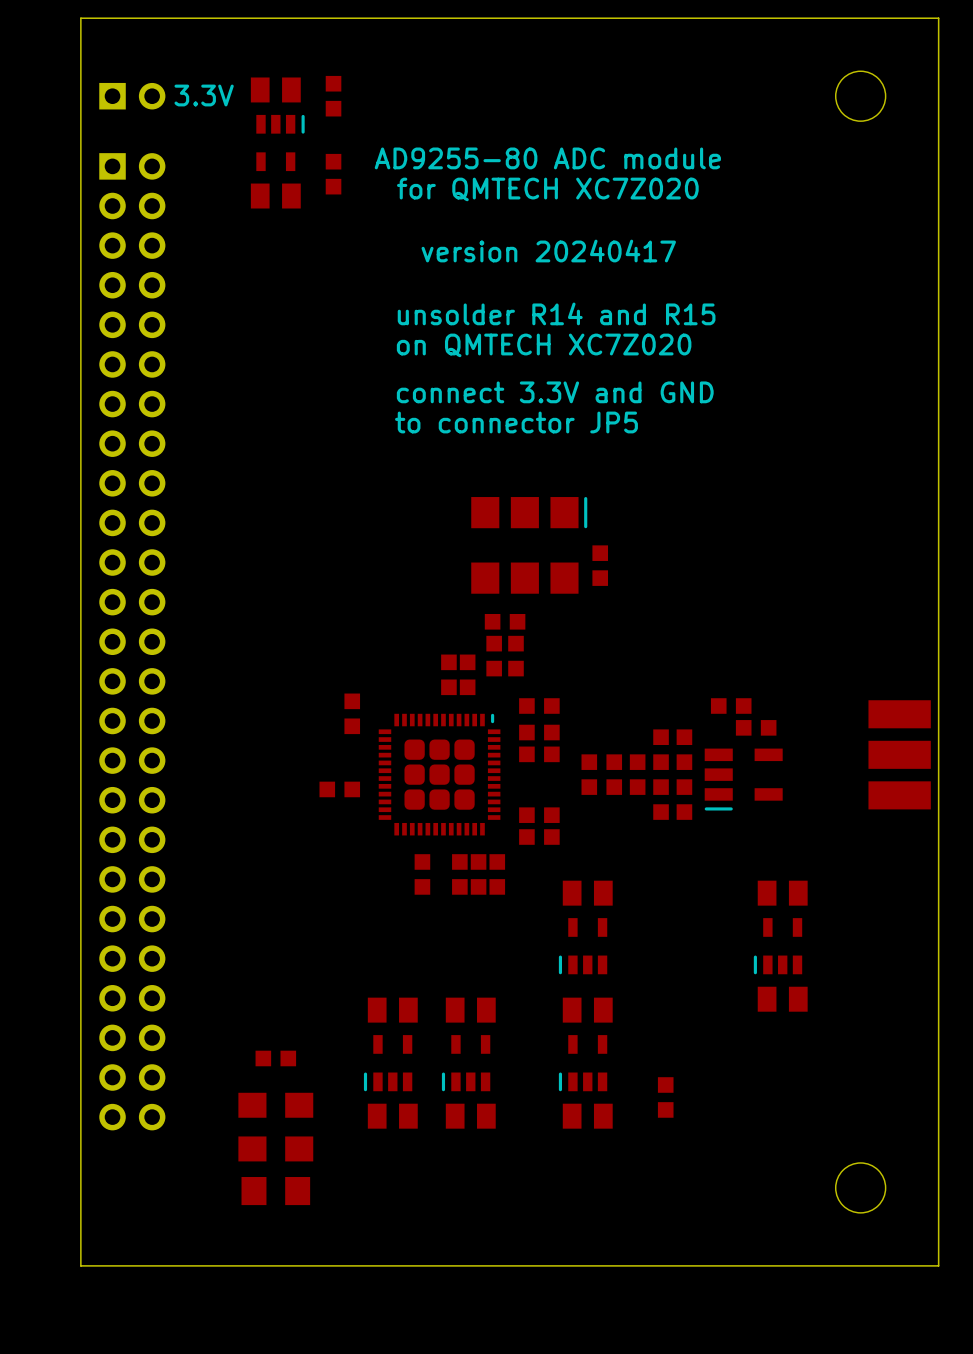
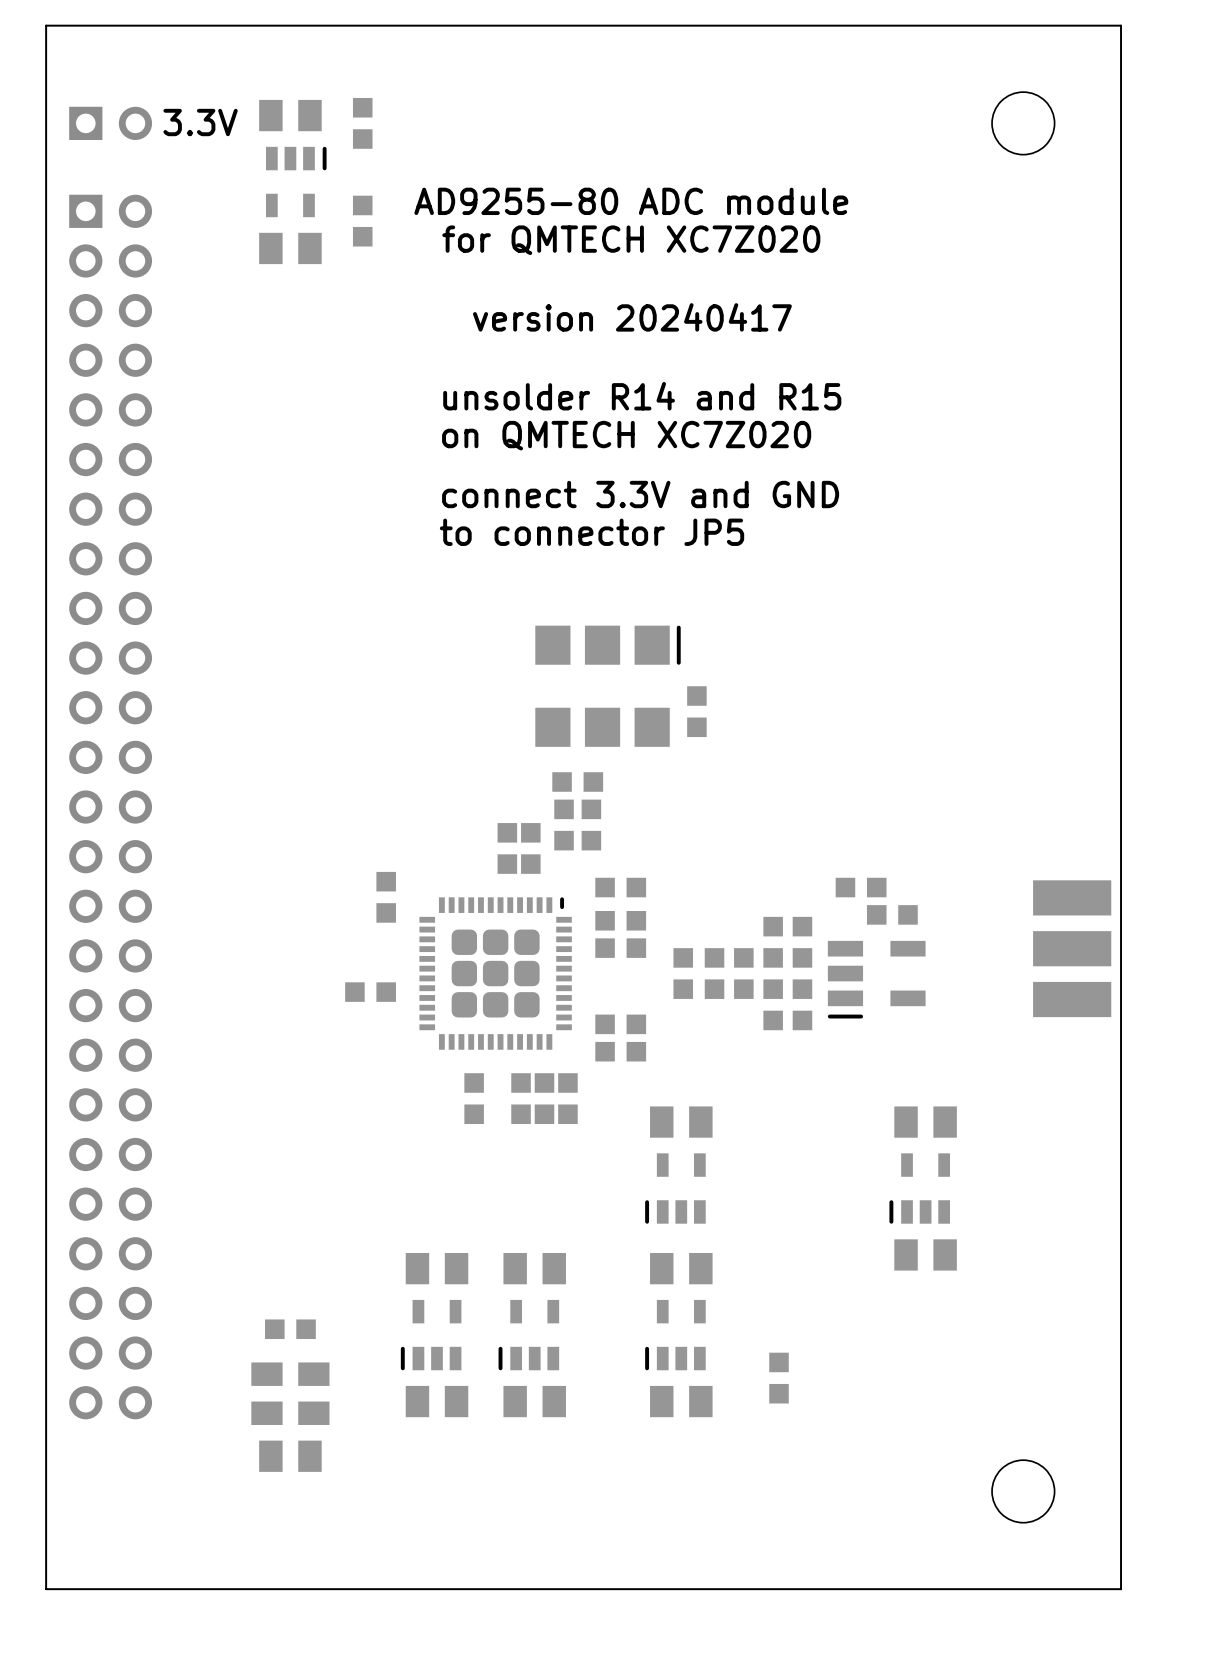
part: none -> (266, 1393)
part: none -> (313, 1393)
part: (252, 1127) -> none
part: (299, 1127) -> none
part: none -> (290, 1456)
part: (275, 1191) -> none

